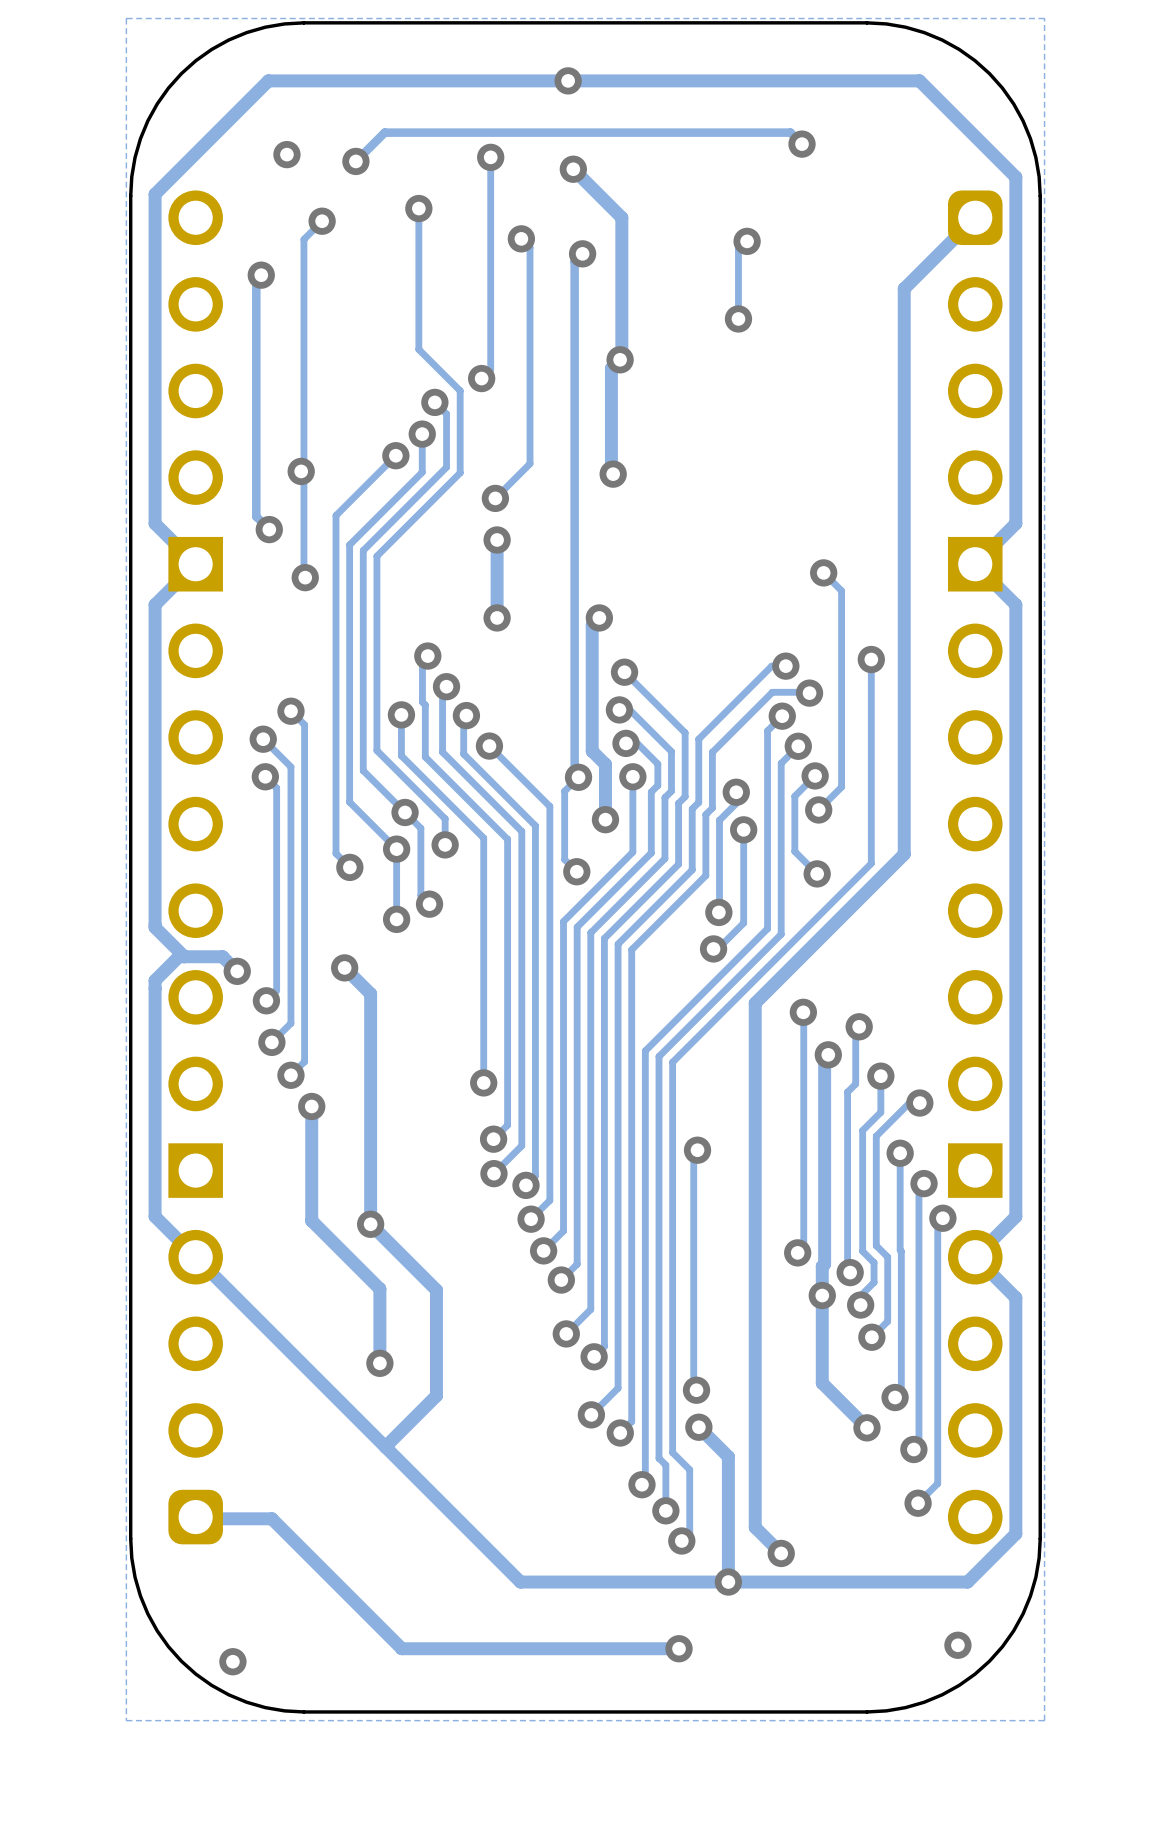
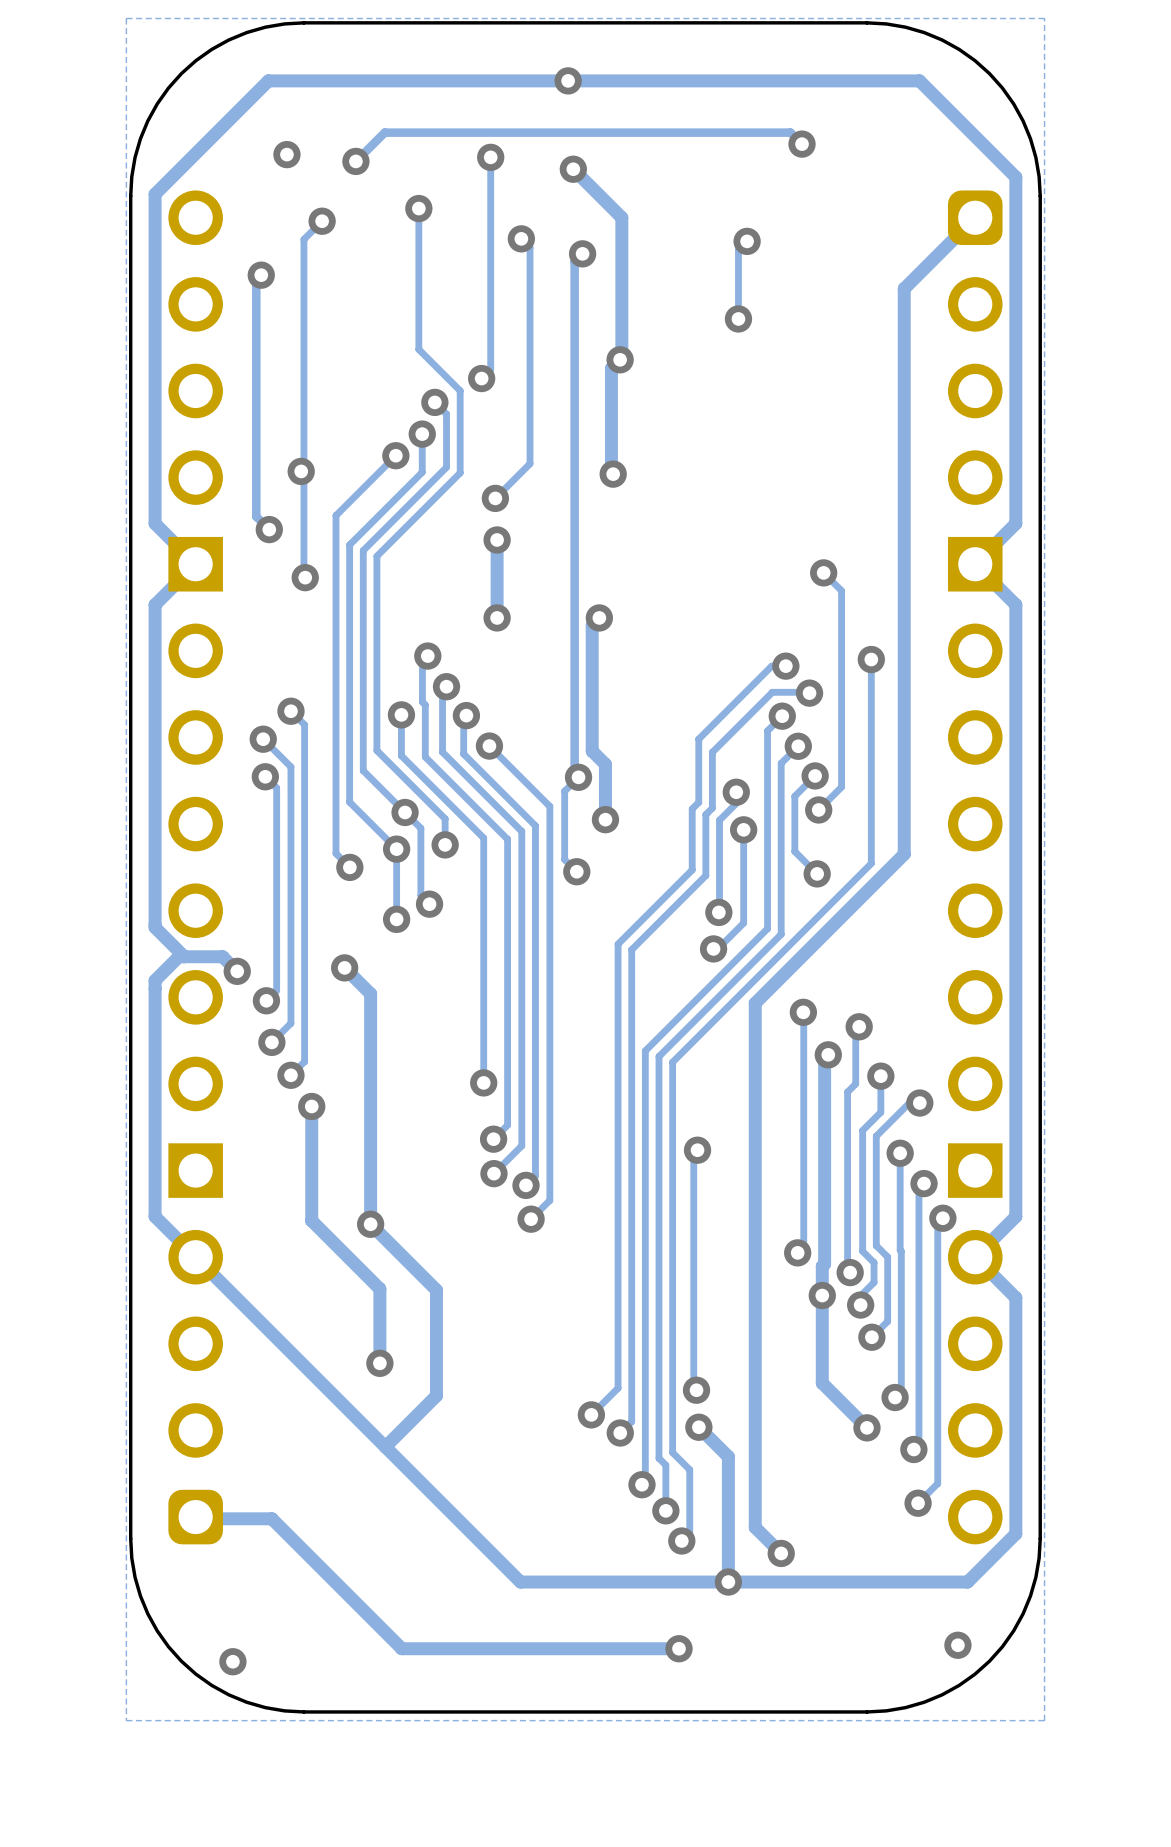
track: (624, 672) (685, 732) (685, 796) (678, 803) (678, 864) (604, 938) (604, 1346) (594, 1356) -> none
via: (624, 672) -> none
track: (619, 709) (629, 709) (671, 751) (671, 791) (664, 797) (664, 858) (590, 932) (590, 1309) (566, 1333) -> none
via: (619, 709) -> none
track: (625, 743) (637, 743) (657, 763) (657, 785) (651, 792) (651, 853) (577, 927) (577, 1264) (561, 1280) -> none
via: (625, 743) -> none
track: (632, 776) (632, 852) (563, 921) (563, 1231) (543, 1250) -> none
via: (632, 776) -> none
via: (543, 1250) -> none
via: (561, 1280) -> none
via: (566, 1333) -> none
via: (594, 1356) -> none

